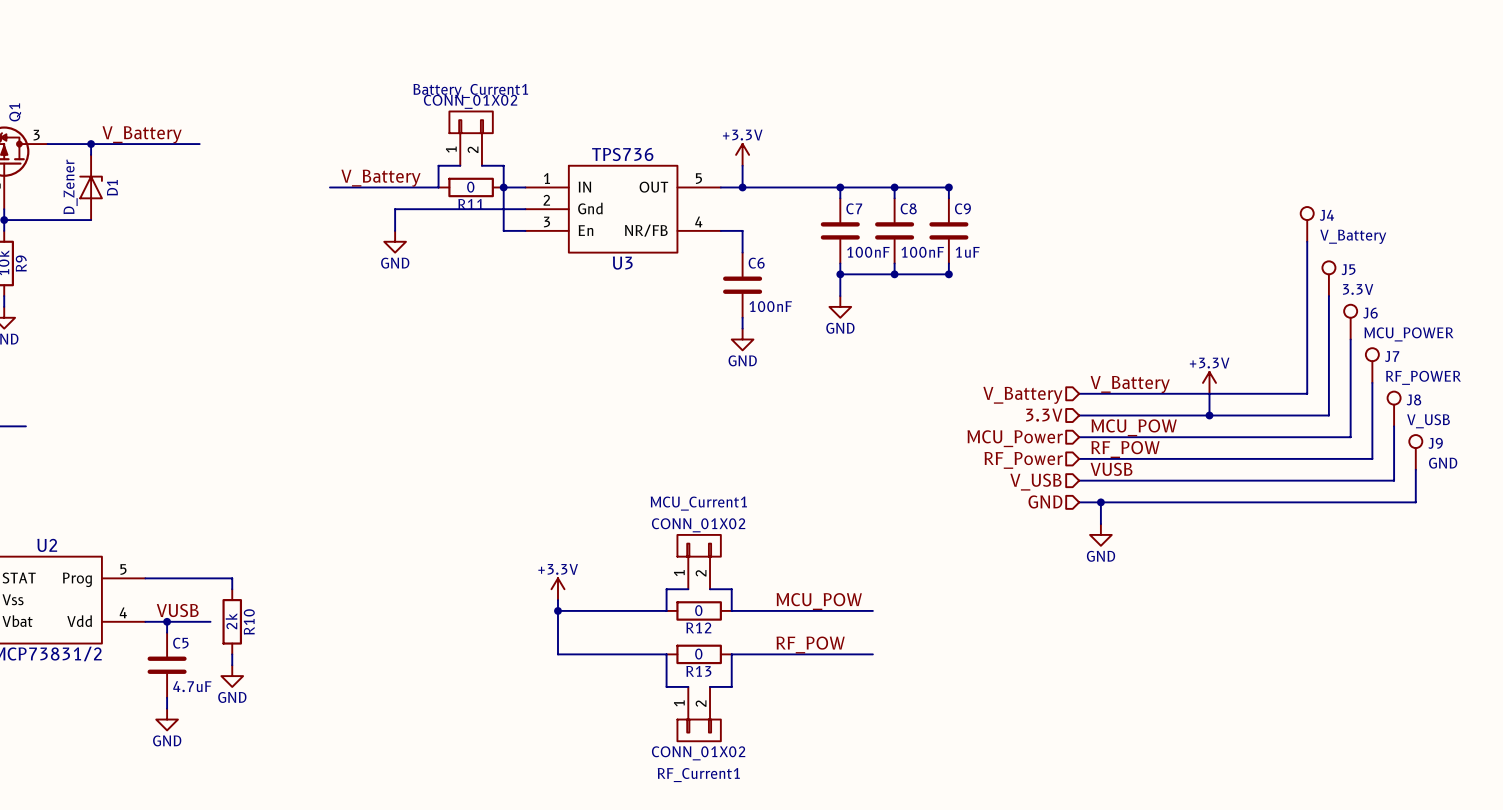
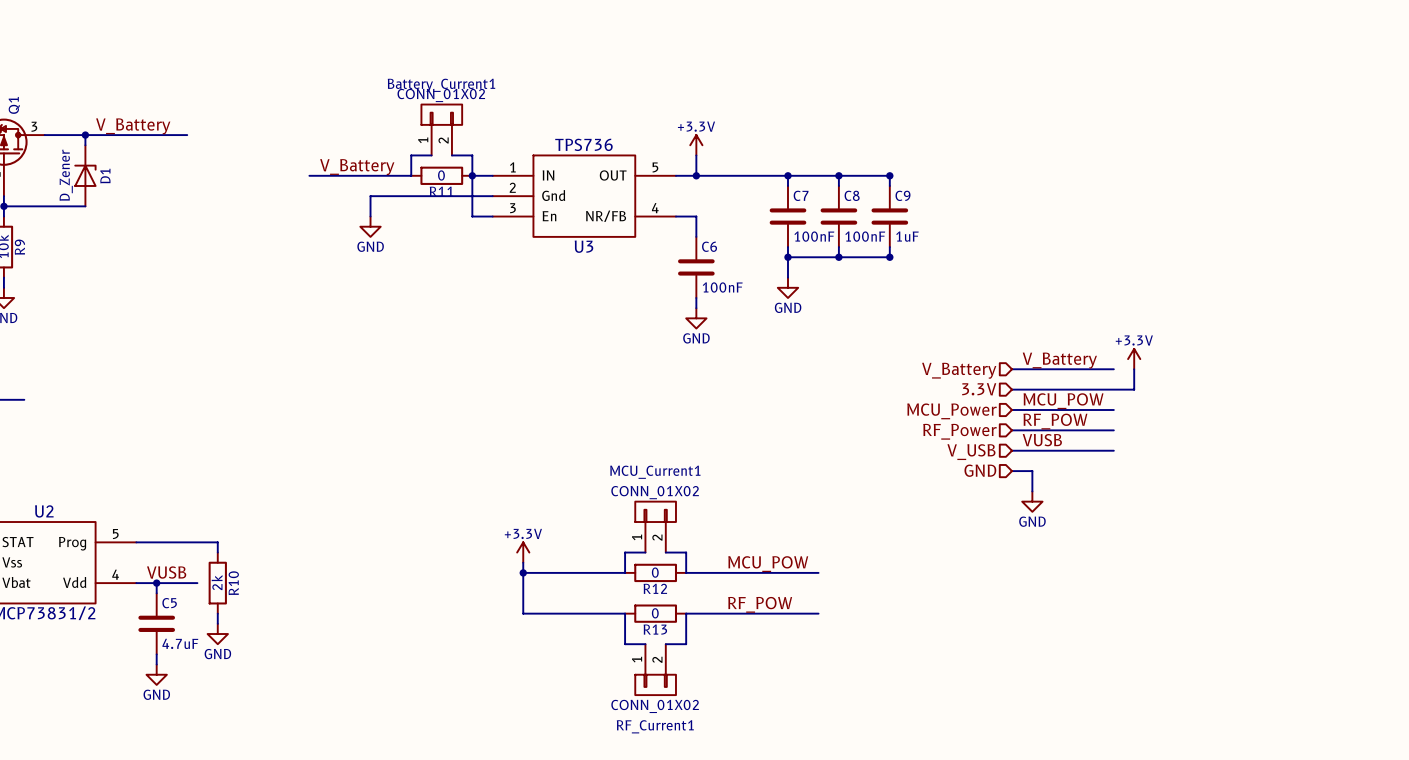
J4: V_Battery (1307, 224) -> none
wire: (1307, 241) (1307, 393) (1187, 393) -> none
J5: 3.3V (1328, 278) -> none
wire: (1328, 296) (1328, 415) (1209, 415) -> none
J6: MCU_POWER (1350, 322) -> none
wire: (1350, 339) (1350, 437) (1187, 437) -> none
J7: RF_POWER (1372, 365) -> none
wire: (1372, 382) (1372, 458) (1187, 458) -> none
J8: V_USB (1394, 408) -> none
junction: (1209, 415) -> none
wire: (1394, 426) (1394, 480) (1187, 480) -> none
J9: GND (1415, 452) -> none
wire: (1415, 469) (1415, 502) (1100, 502) -> none
junction: (1100, 502) -> none

